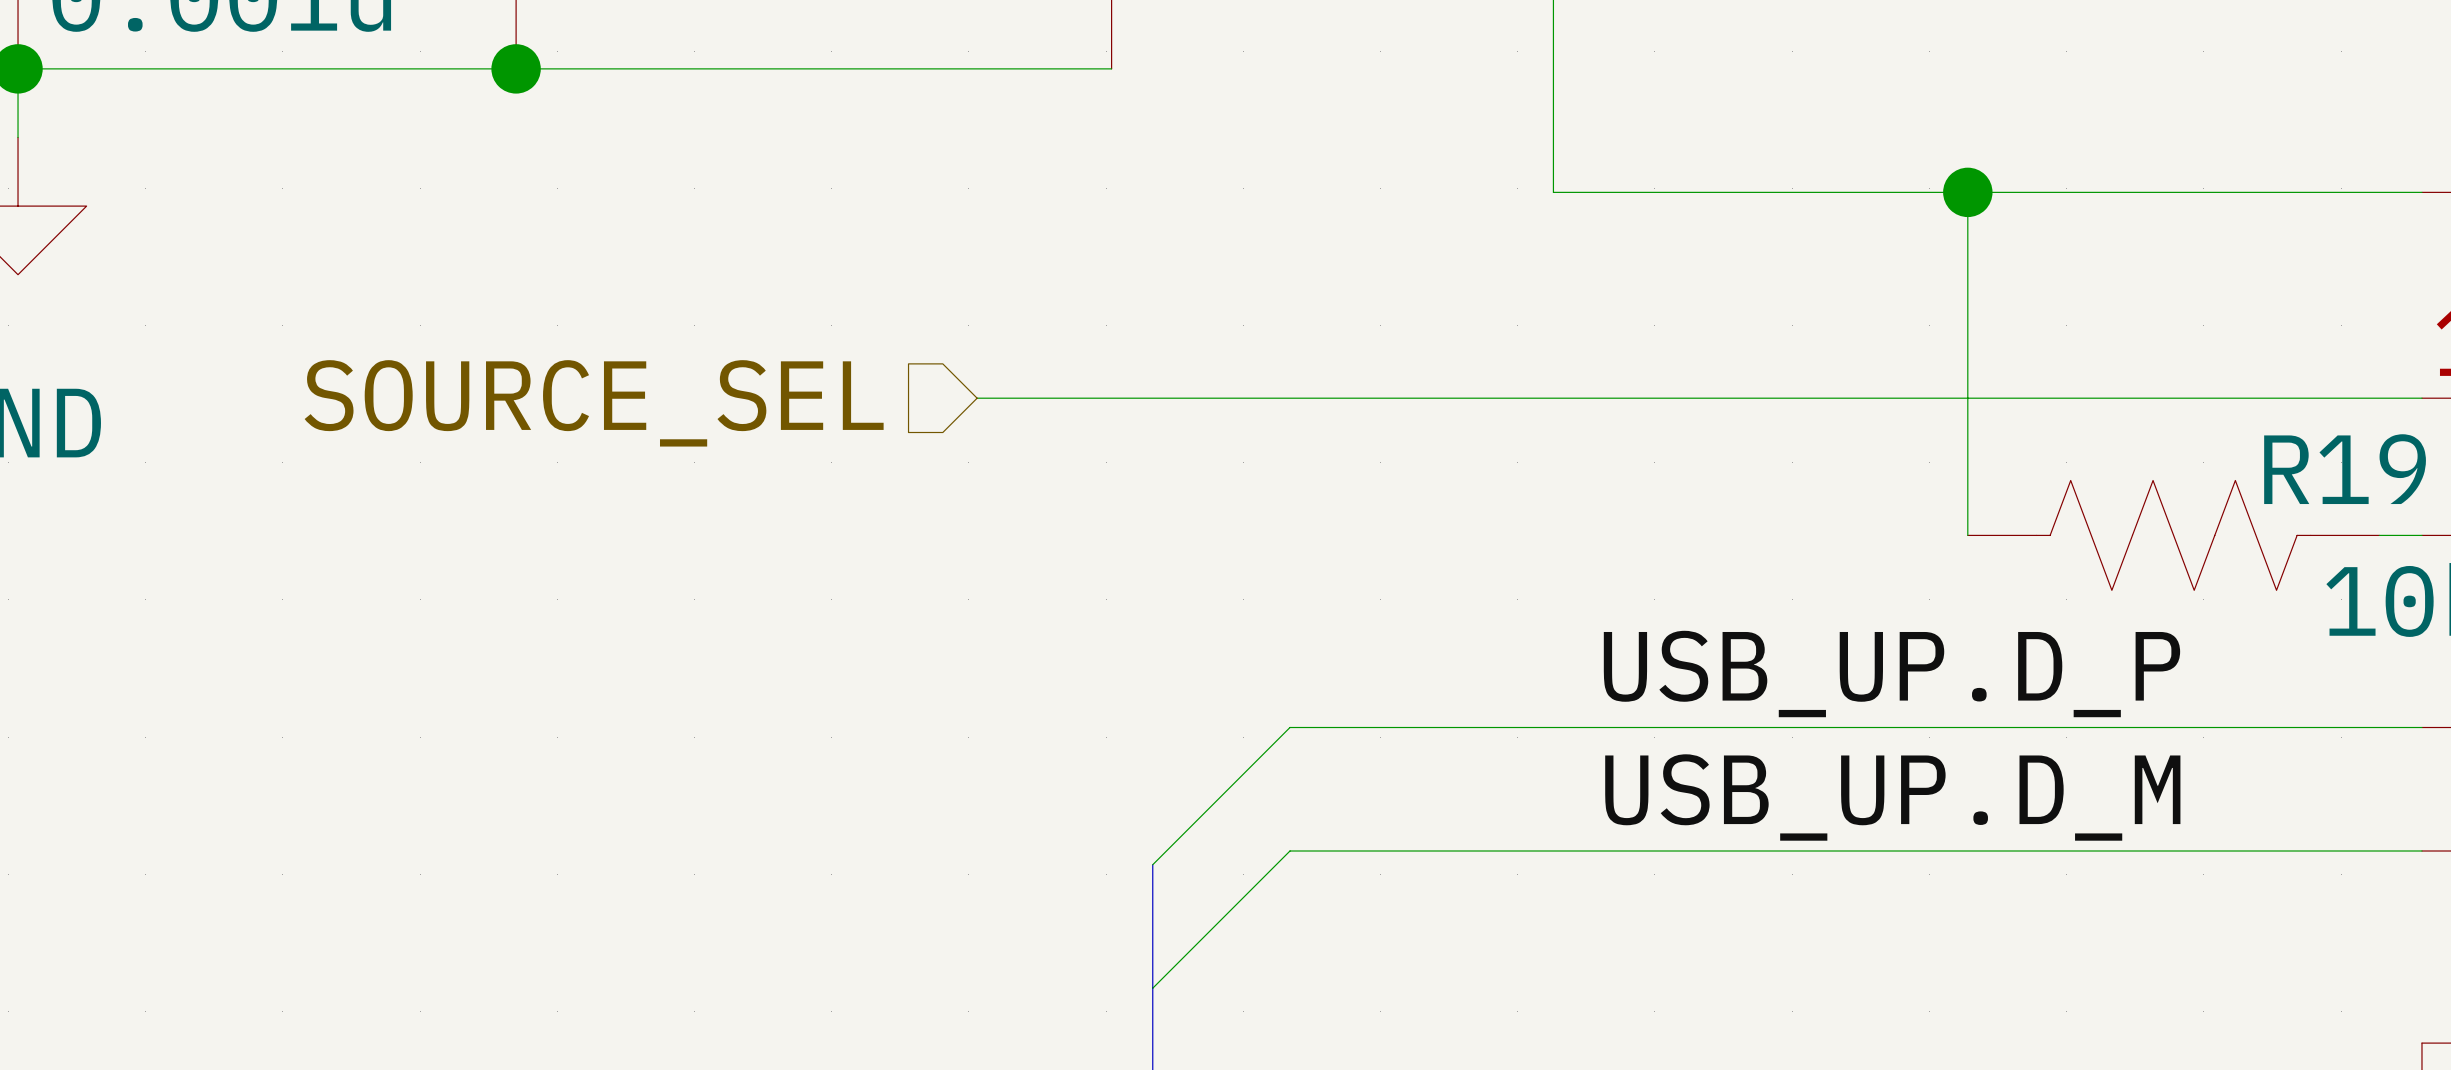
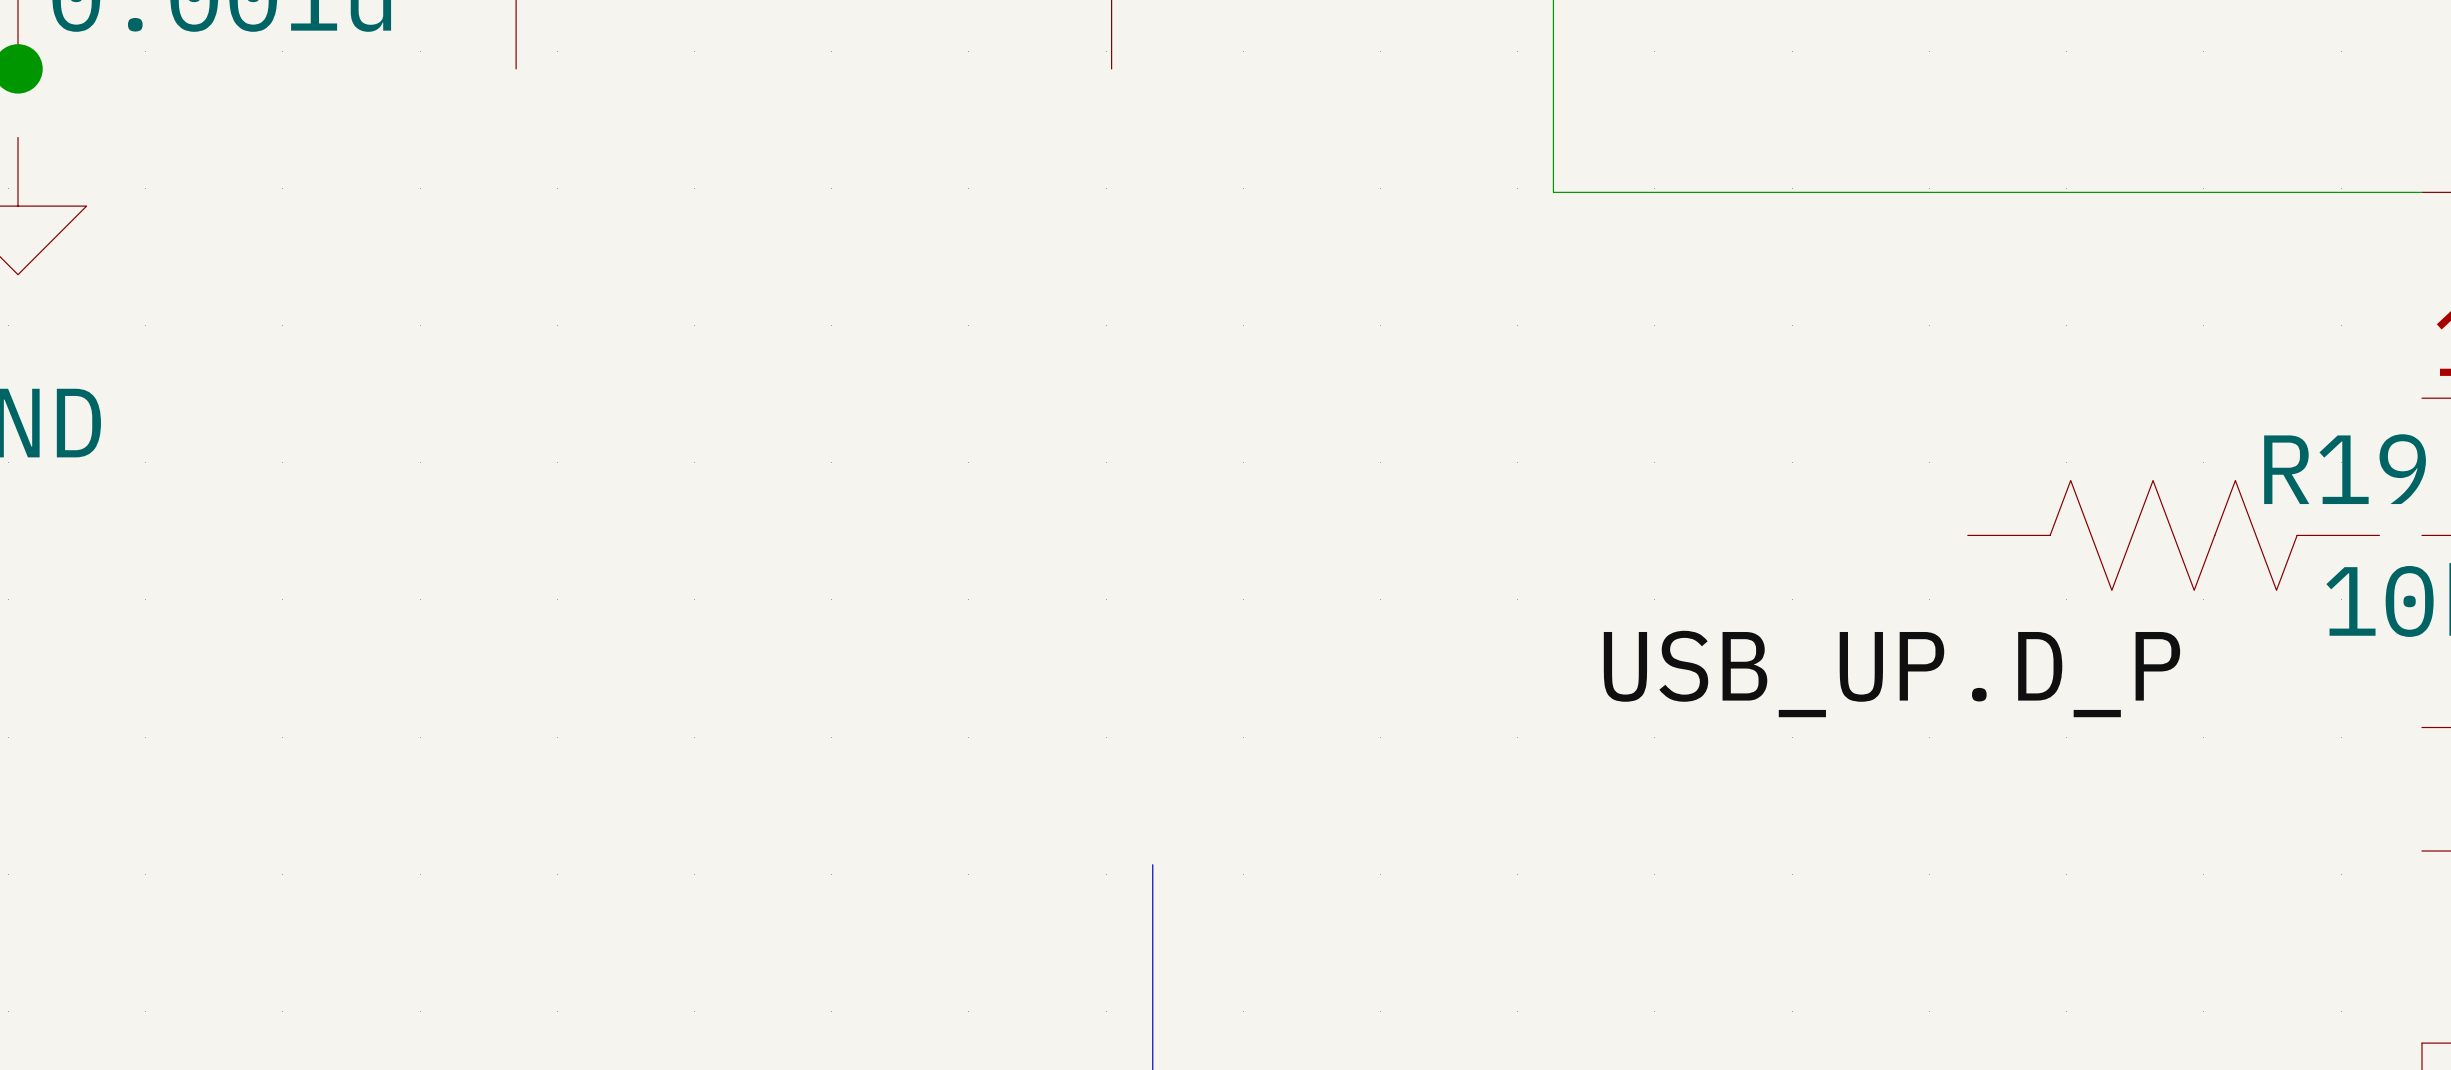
junction: (516, 68) -> none
wire: (1111, 68) (18, 68) (18, 137) -> none
wire: (1967, 192) (1967, 535) -> none
junction: (1967, 192) -> none
wire: (977, 398) (2421, 398) -> none
hierarchical label: SOURCE_SEL (594, 403) -> none
wire: (2379, 535) (2421, 535) -> none
wire: (2421, 727) (1289, 727) (1152, 864) -> none
label: USB_UP.D_M (1892, 797) -> none
wire: (2421, 851) (1289, 851) (1152, 988) -> none

